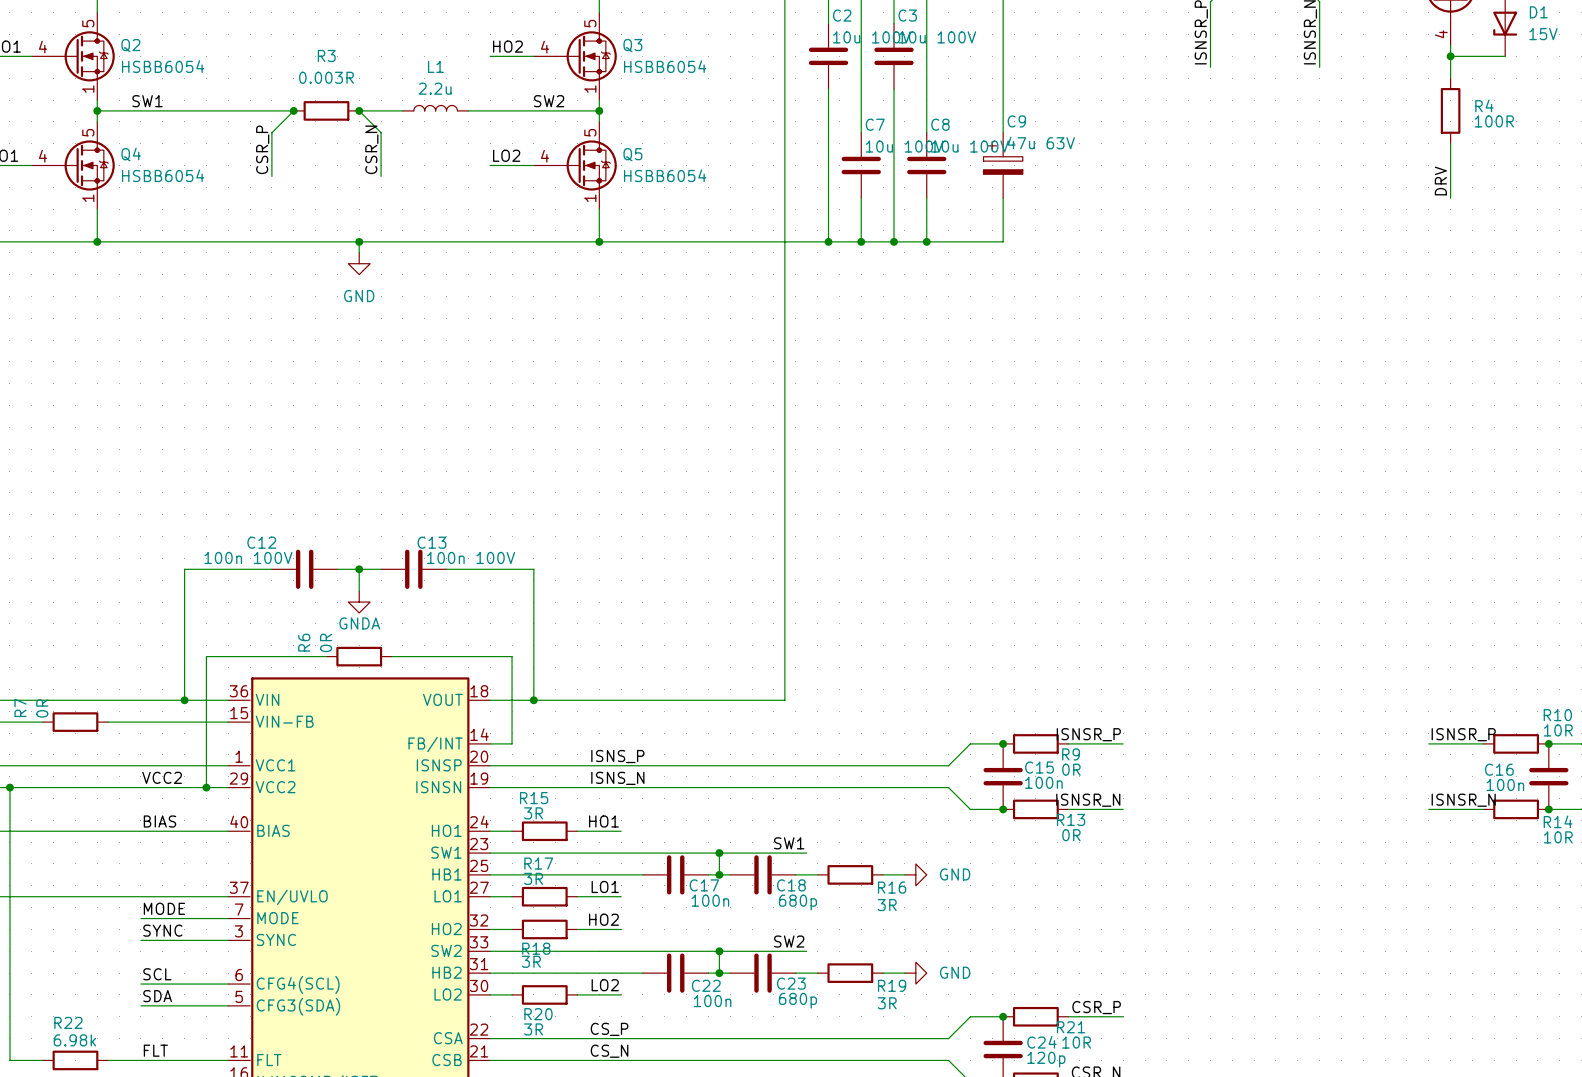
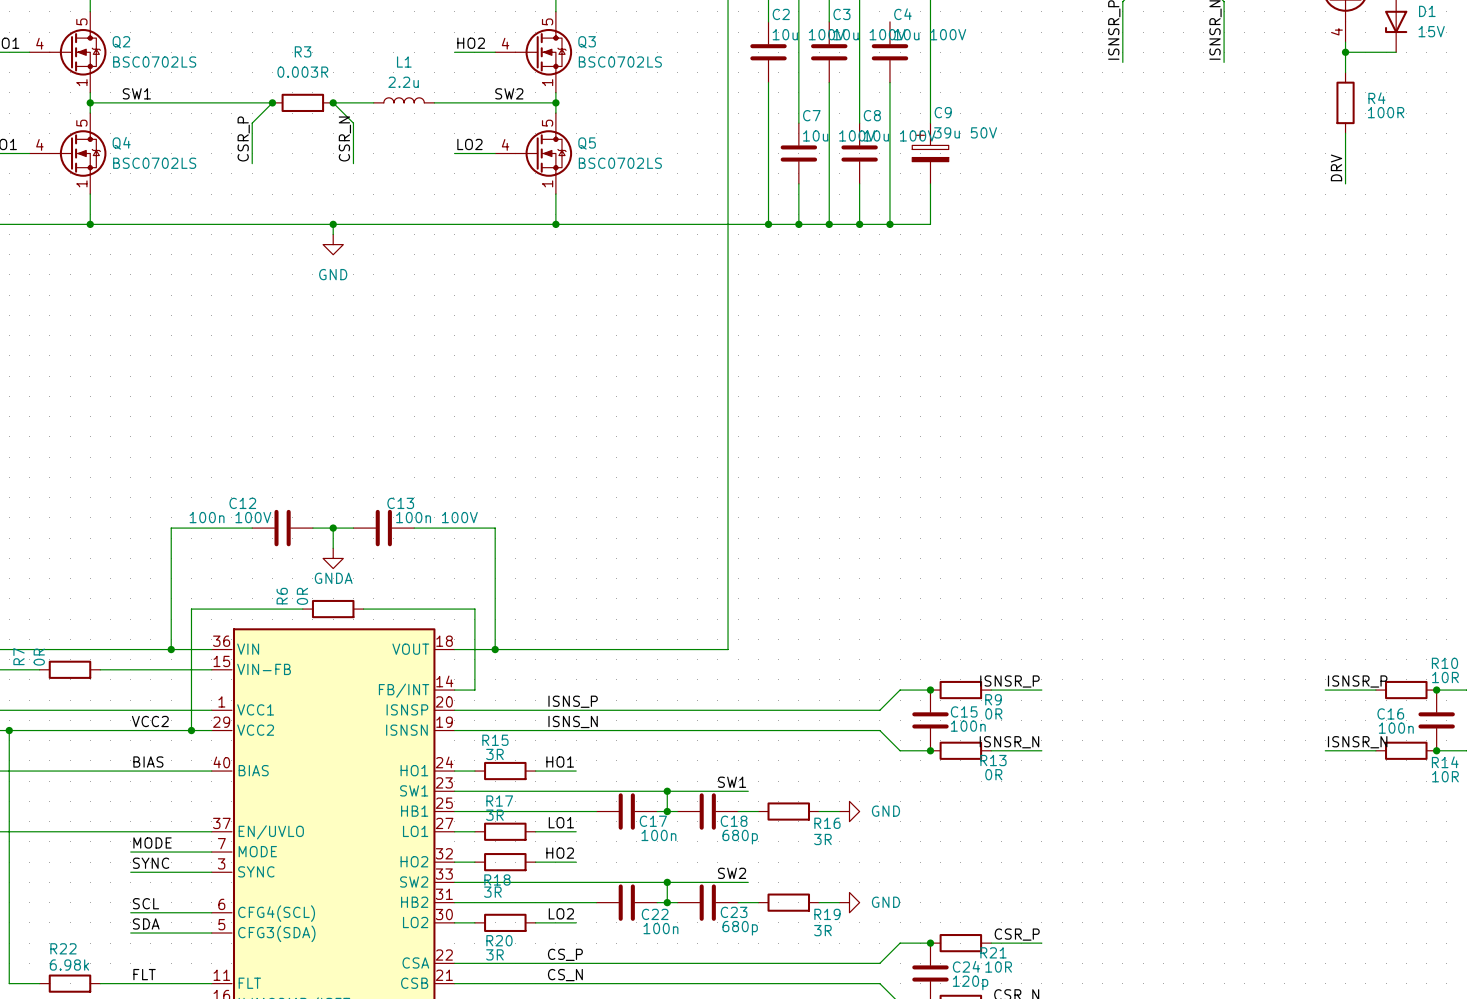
C4: none -> 10u 100V (889, 52)
Q2 value: HSBB6054 (163, 66) -> BSC0702LS (154, 62)
Q3 value: HSBB6054 (665, 66) -> BSC0702LS (620, 62)
wire: none -> (889, 82) (889, 224)
C9 value: 47u 63V (1041, 143) -> 39u 50V (965, 132)
Q4 value: HSBB6054 (163, 175) -> BSC0702LS (154, 163)
Q5 value: HSBB6054 (665, 175) -> BSC0702LS (620, 163)
junction: none -> (889, 224)

